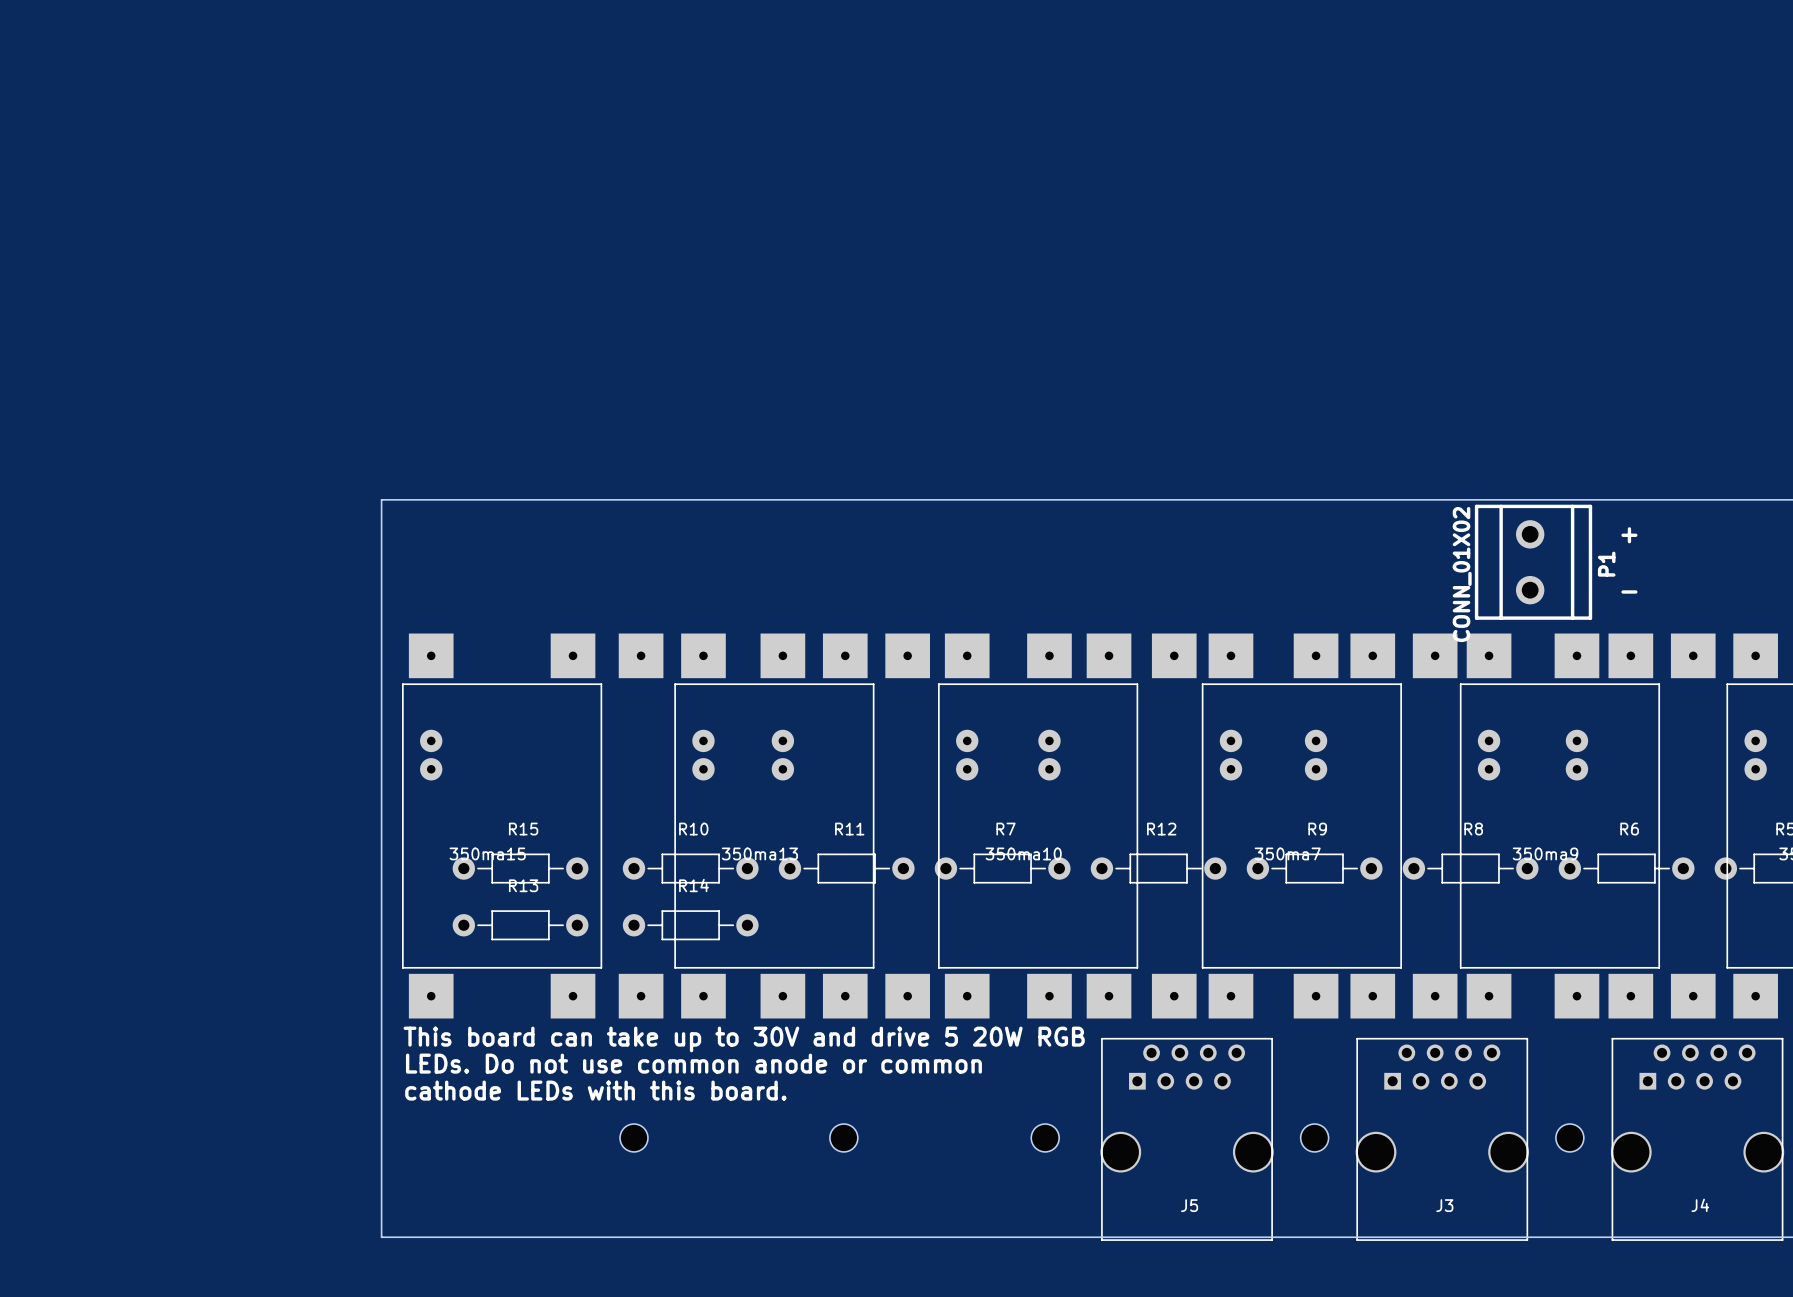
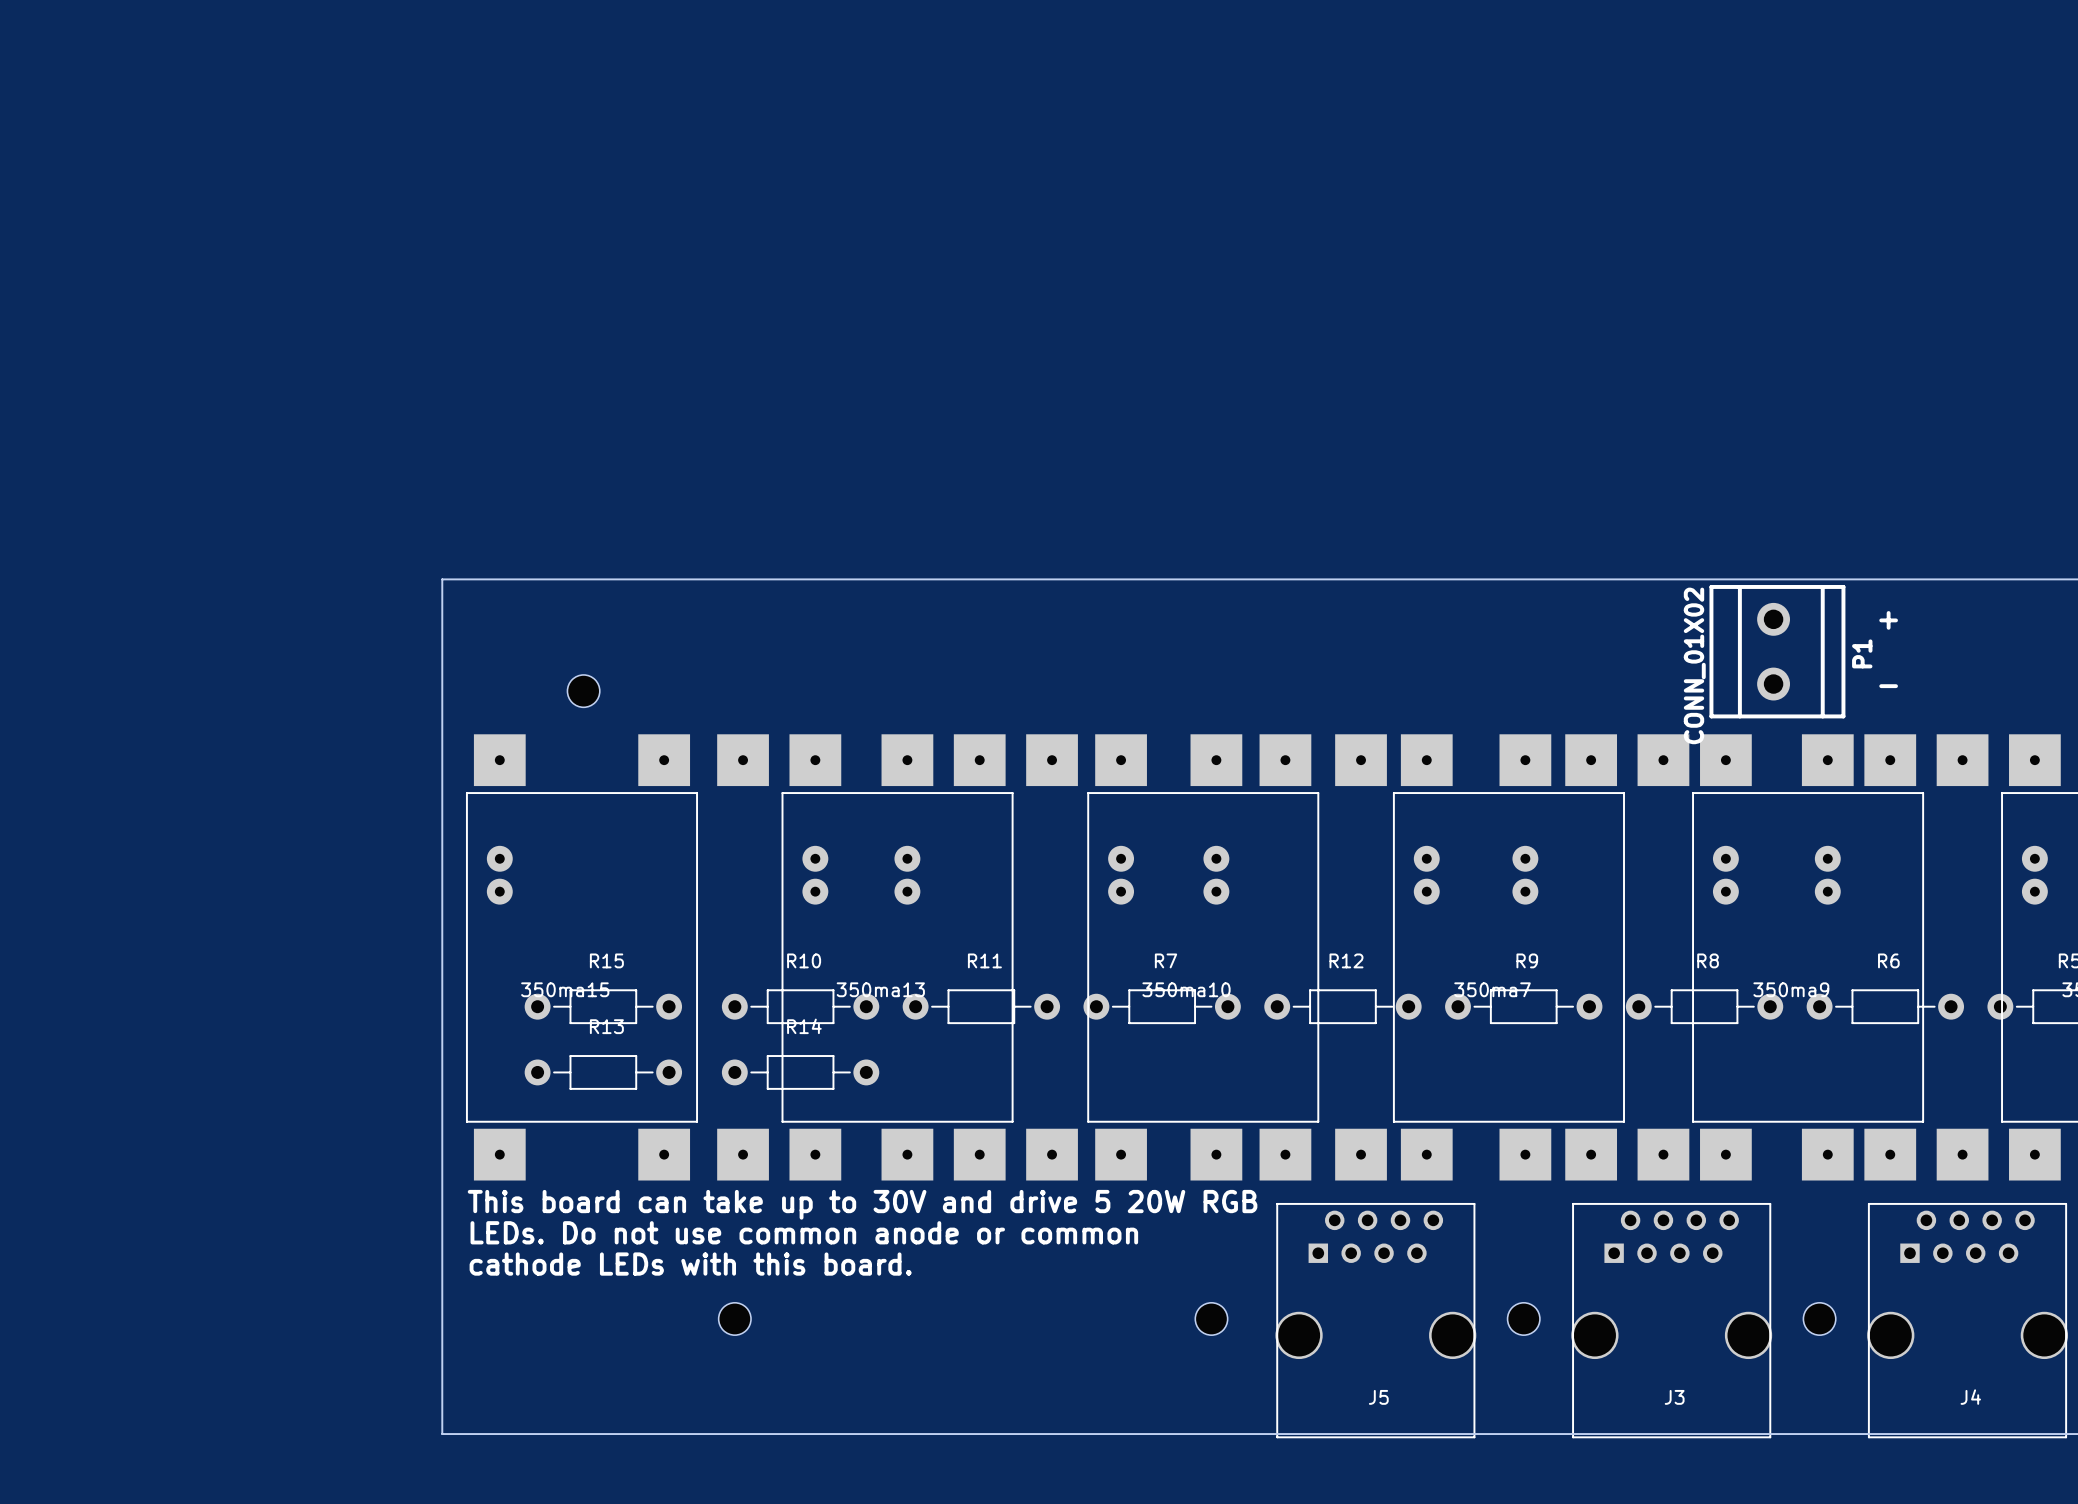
part: none -> (583, 691)
part: (843, 1137) -> none

